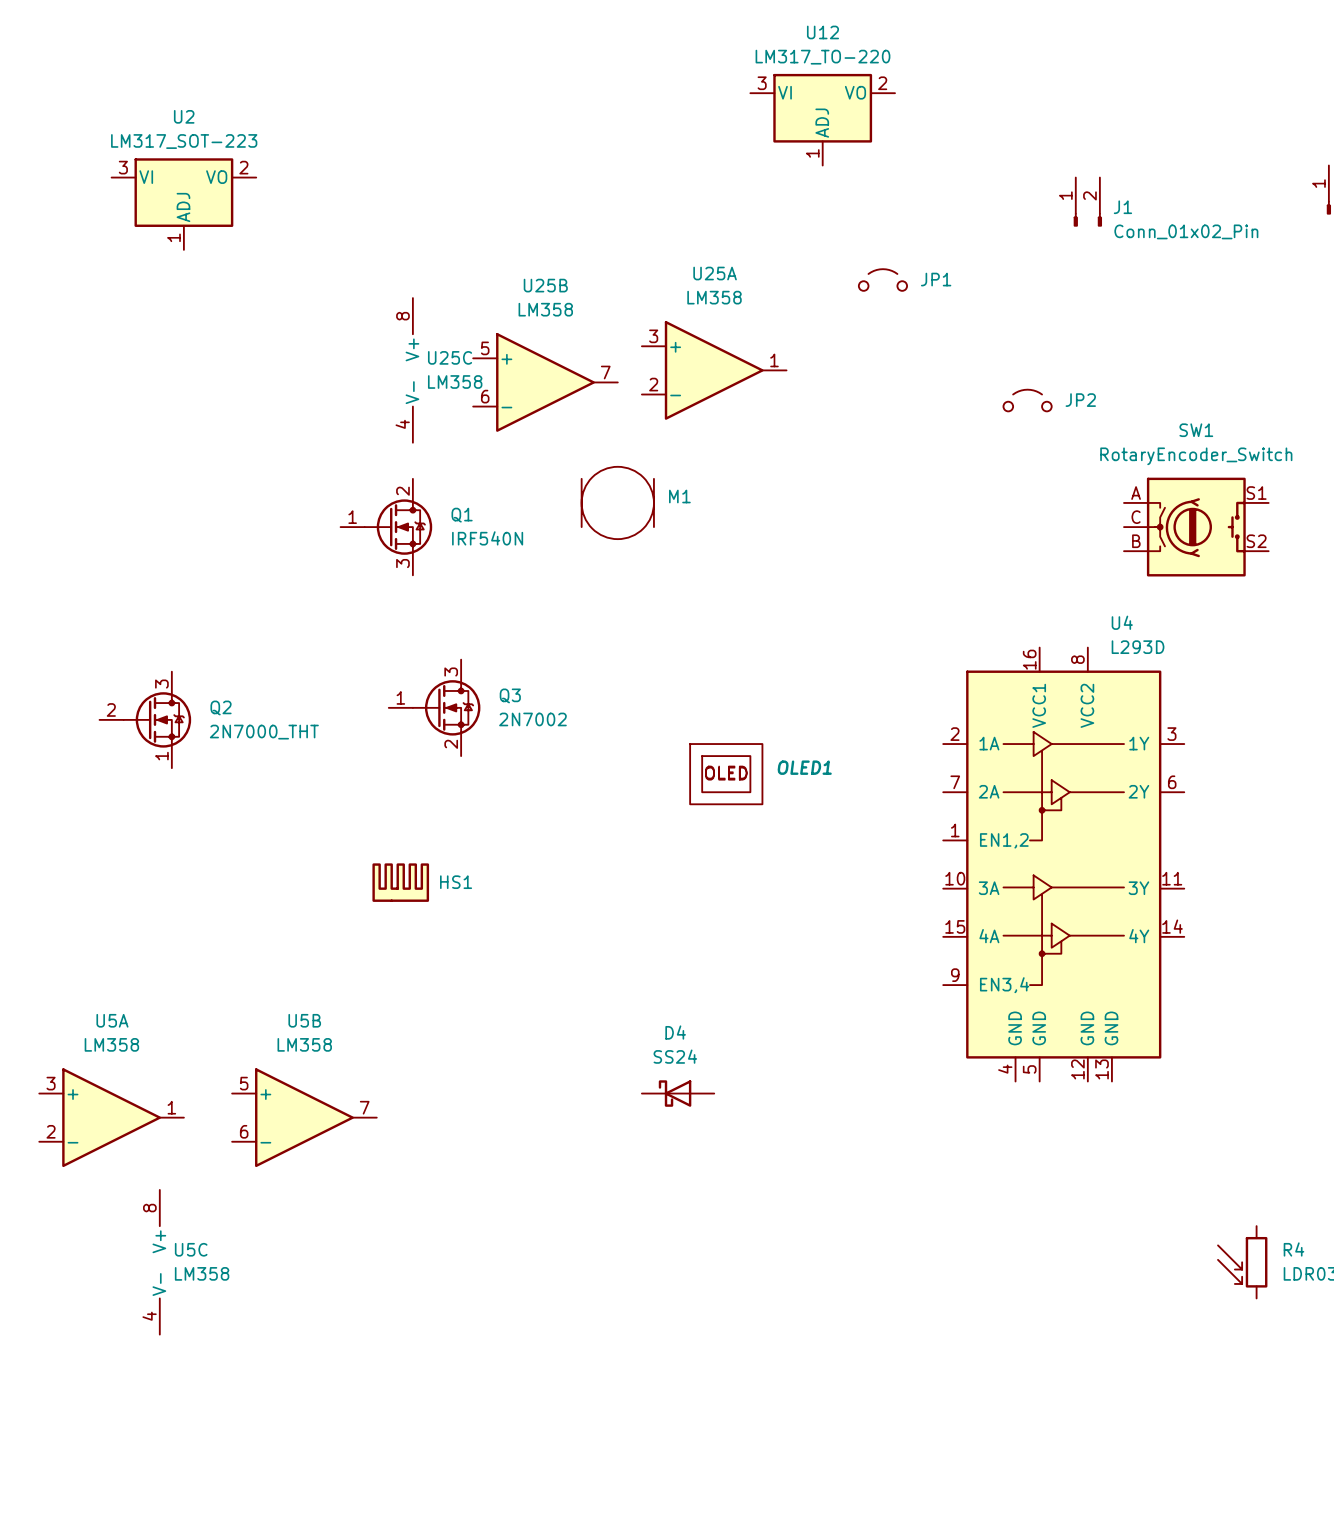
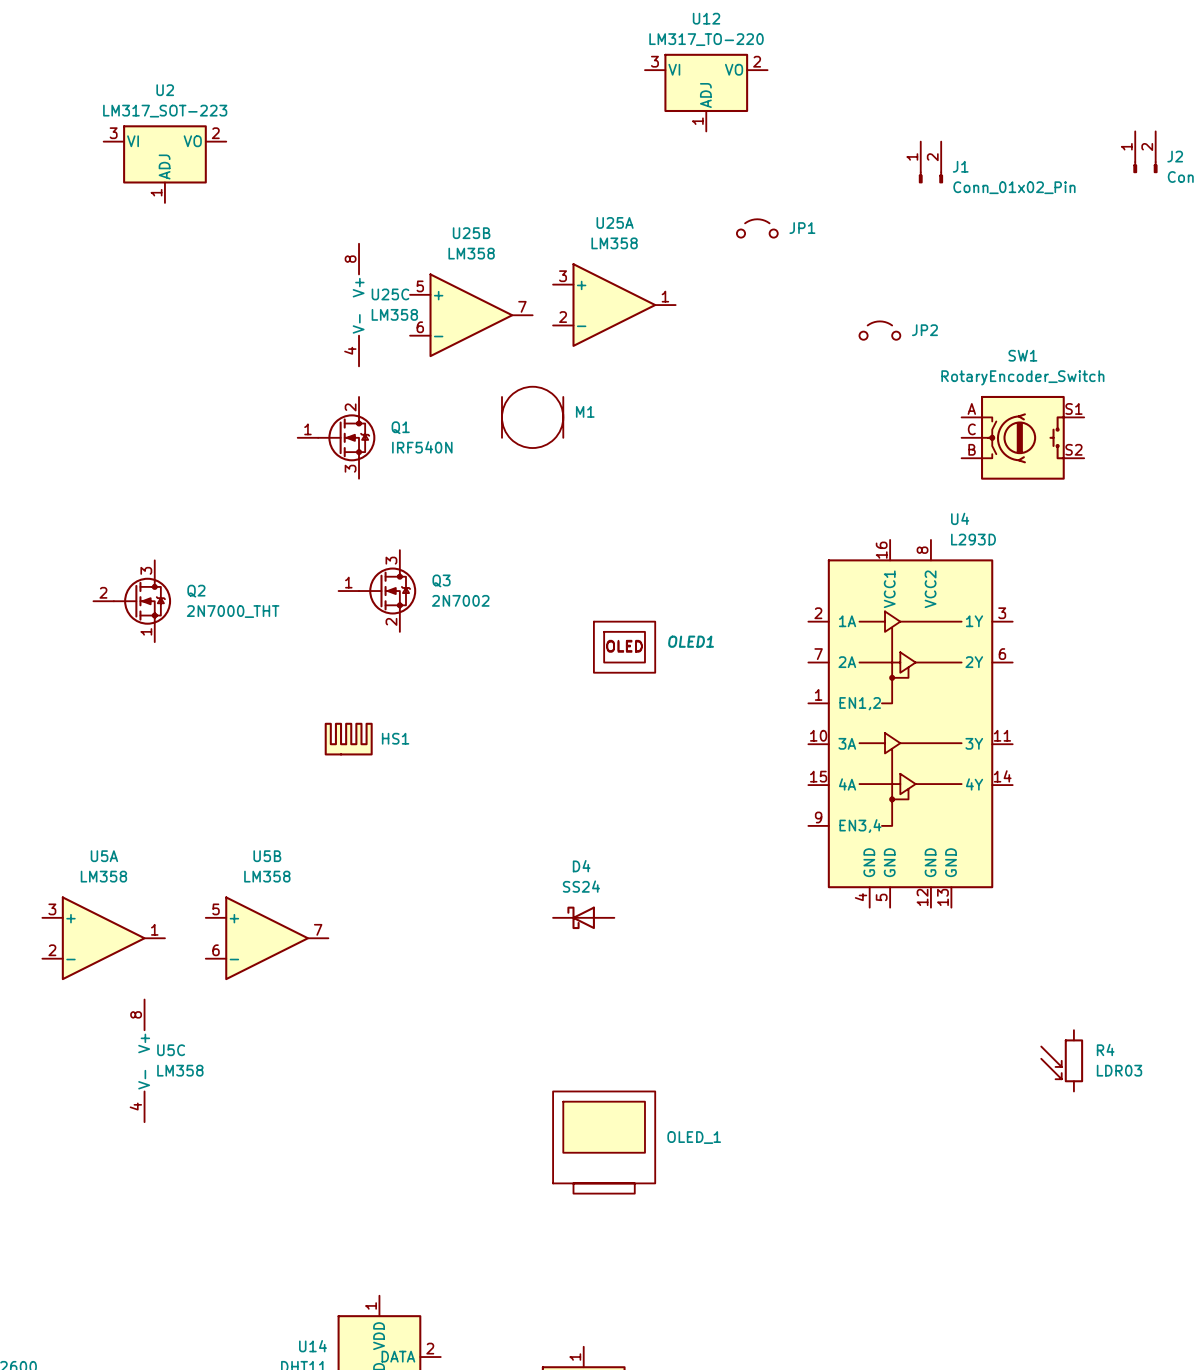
OLED_1: none -> (604, 1142)

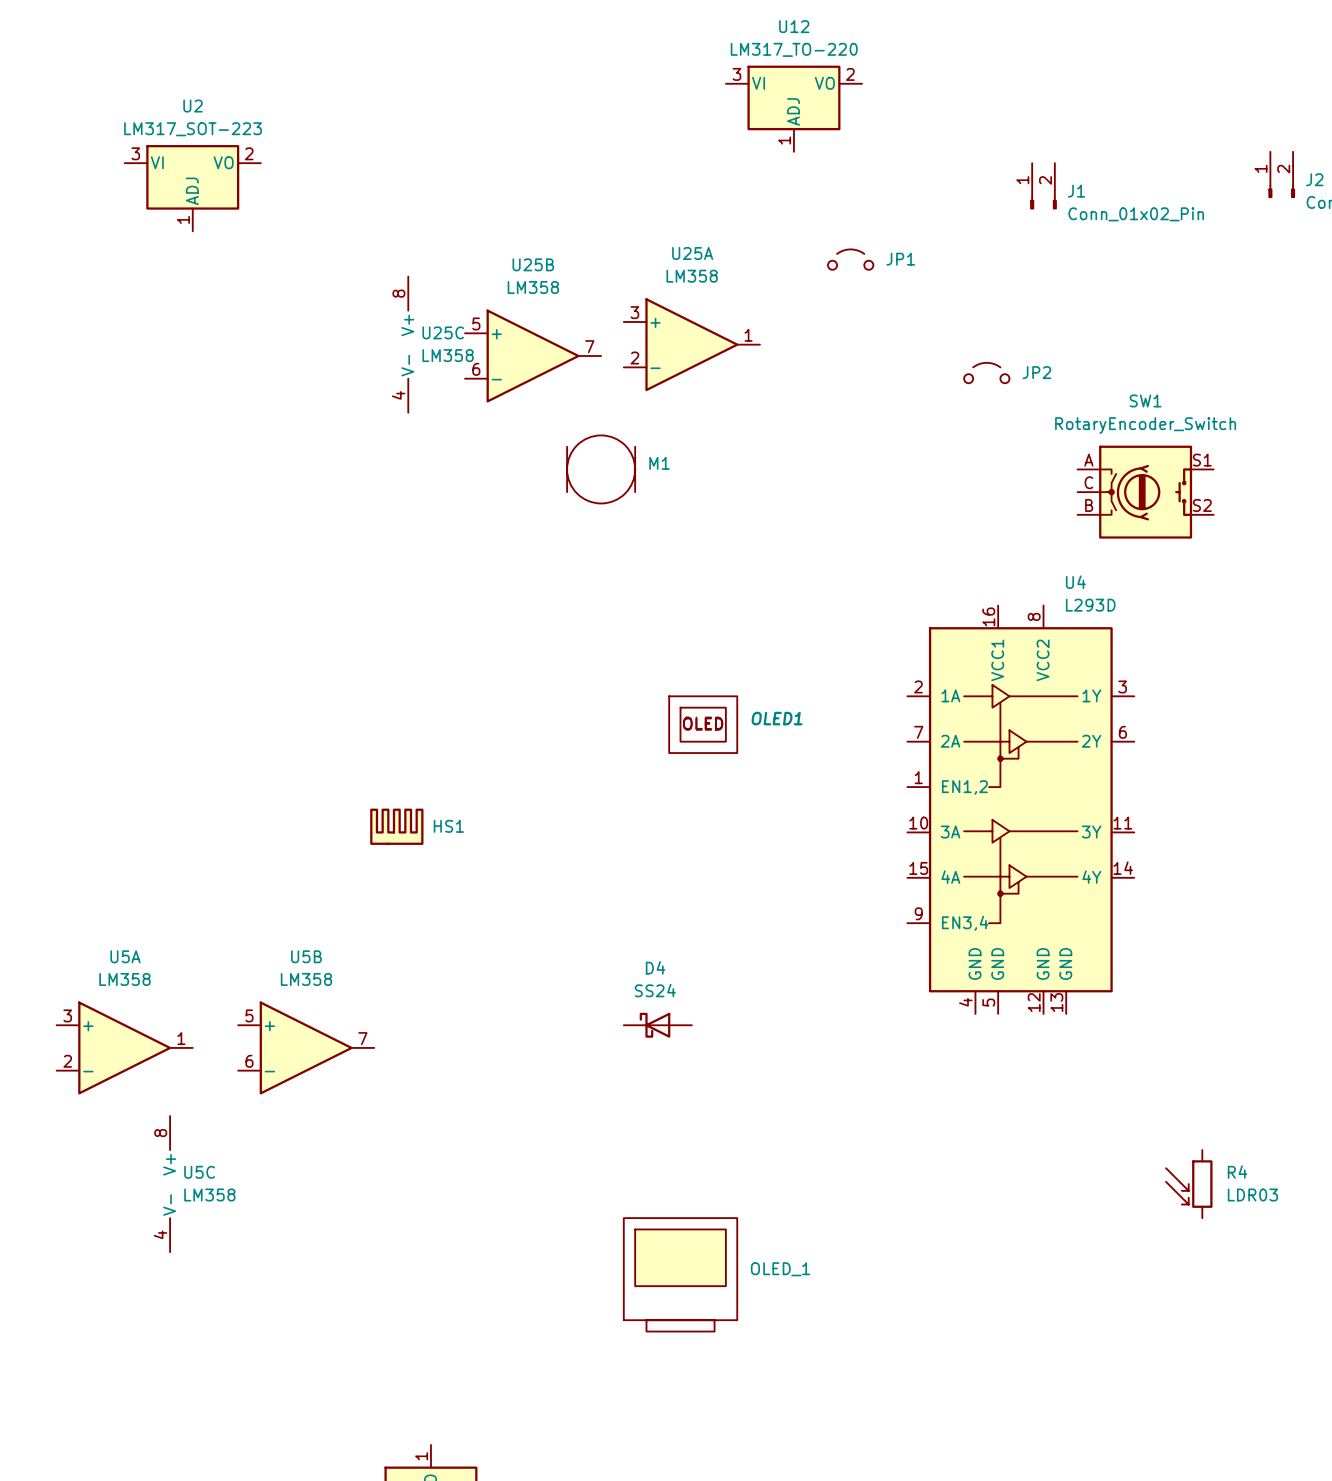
Q1: IRF540N (336, 437) -> none
Q3: 2N7002 (377, 591) -> none
Q2: 2N7000_THT (132, 601) -> none

